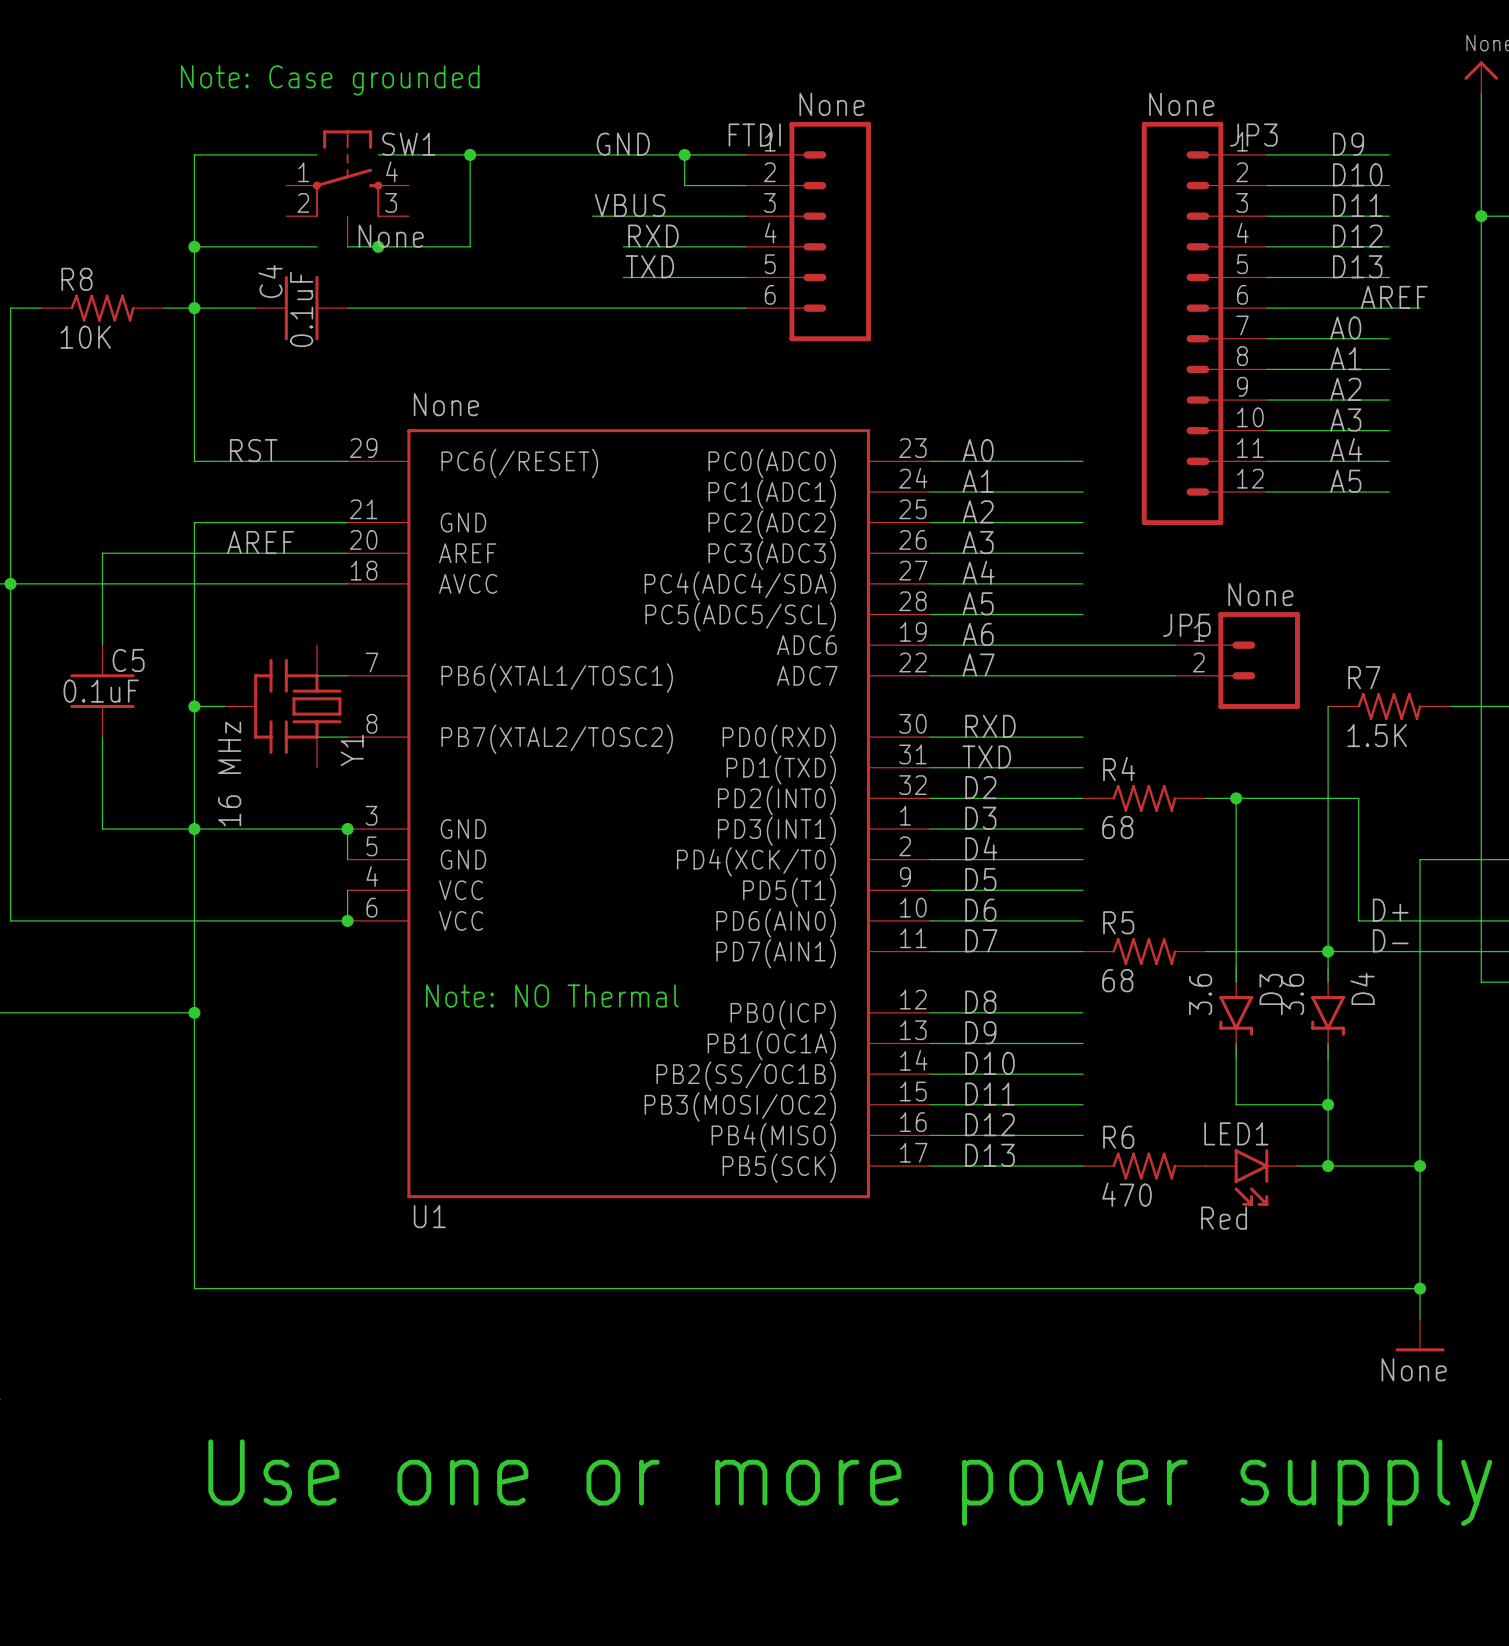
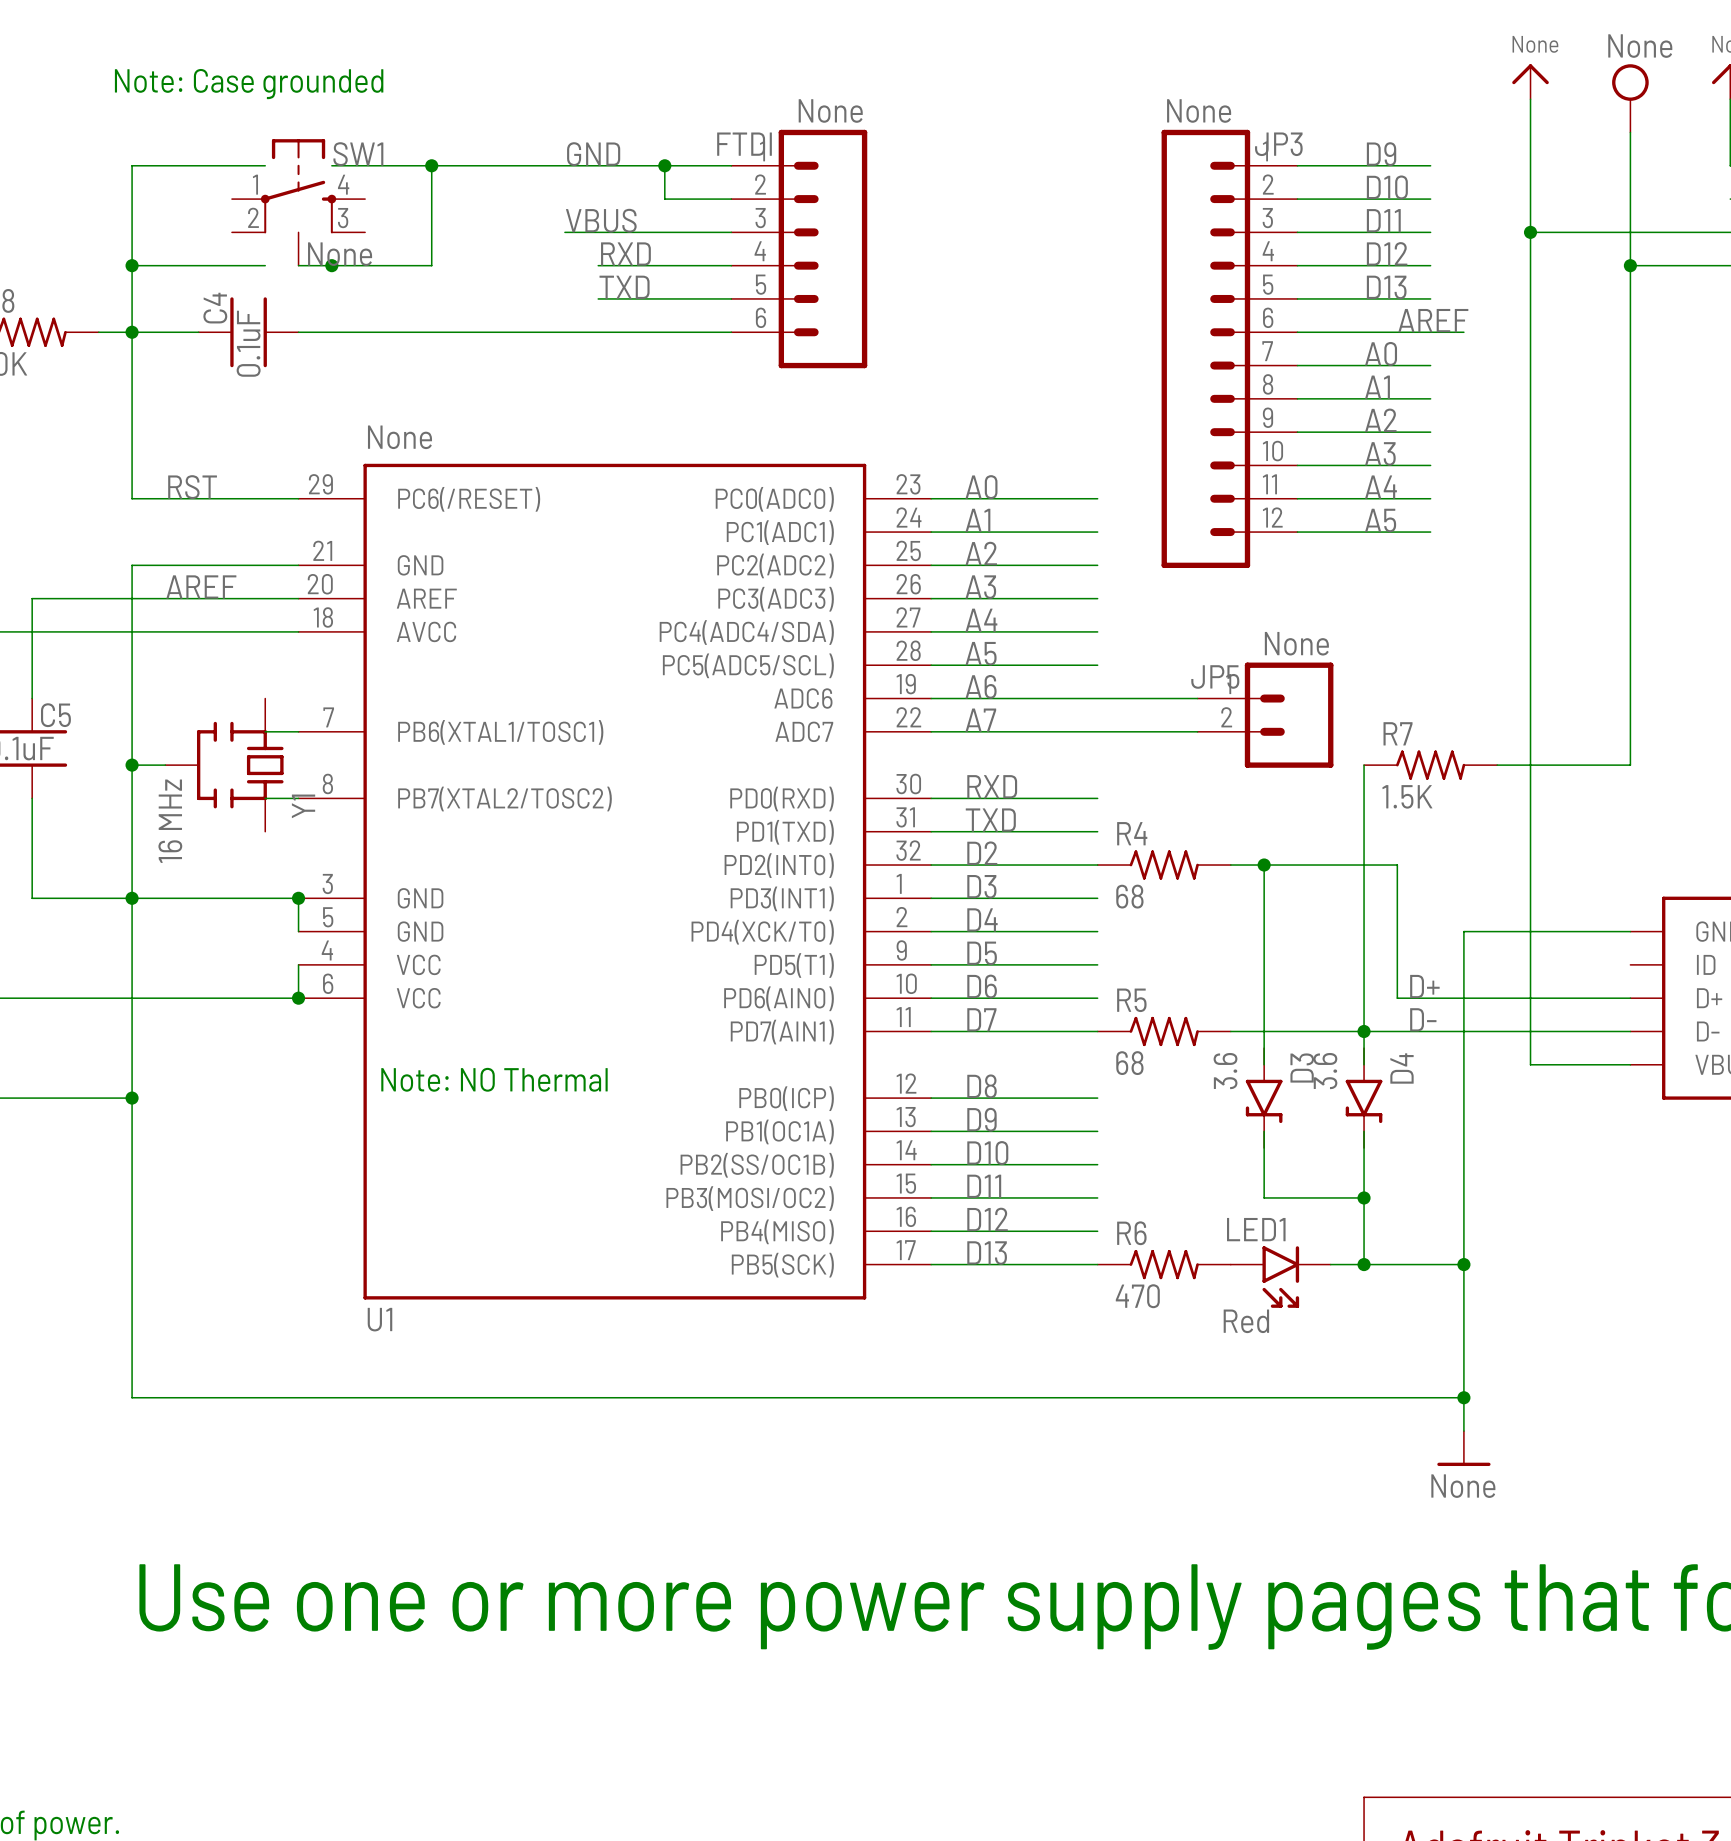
Y1 symbol: [225, 645, 342, 768] -> [165, 698, 284, 832]

